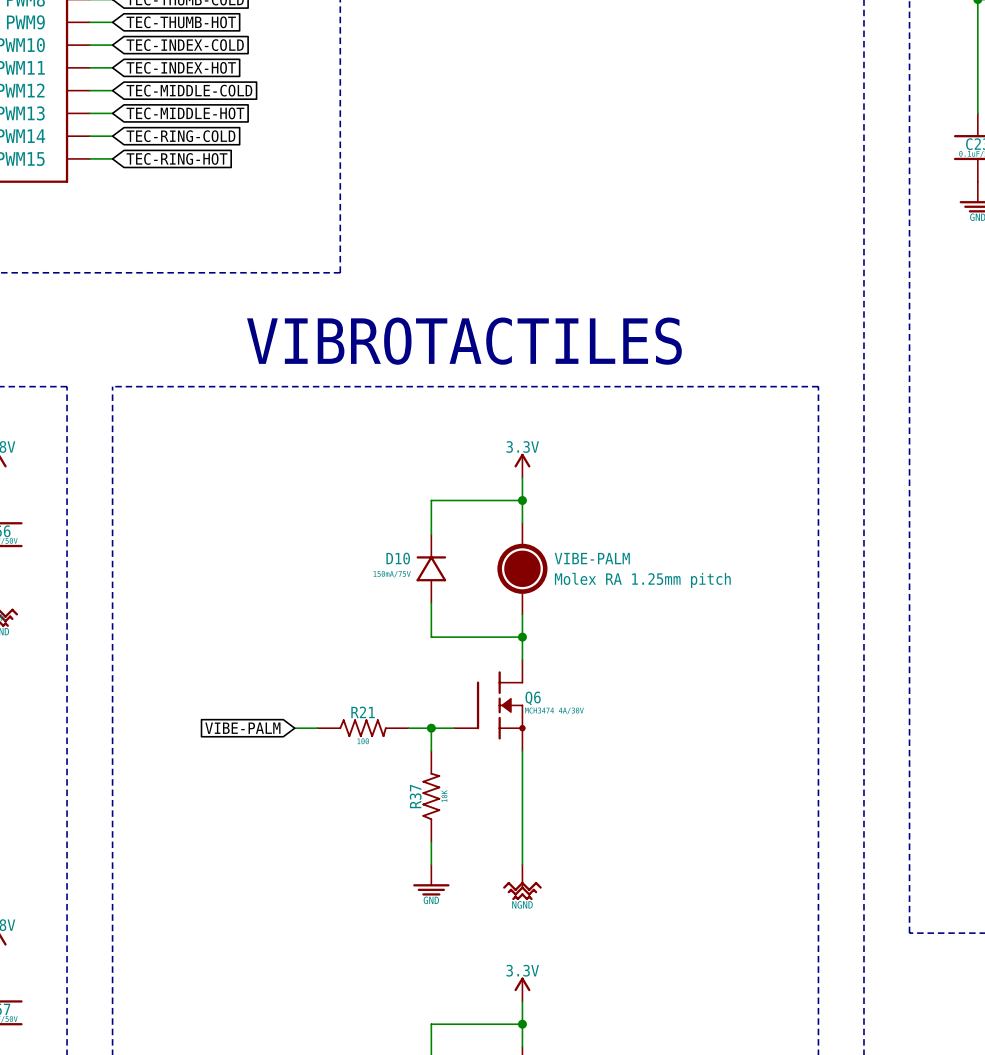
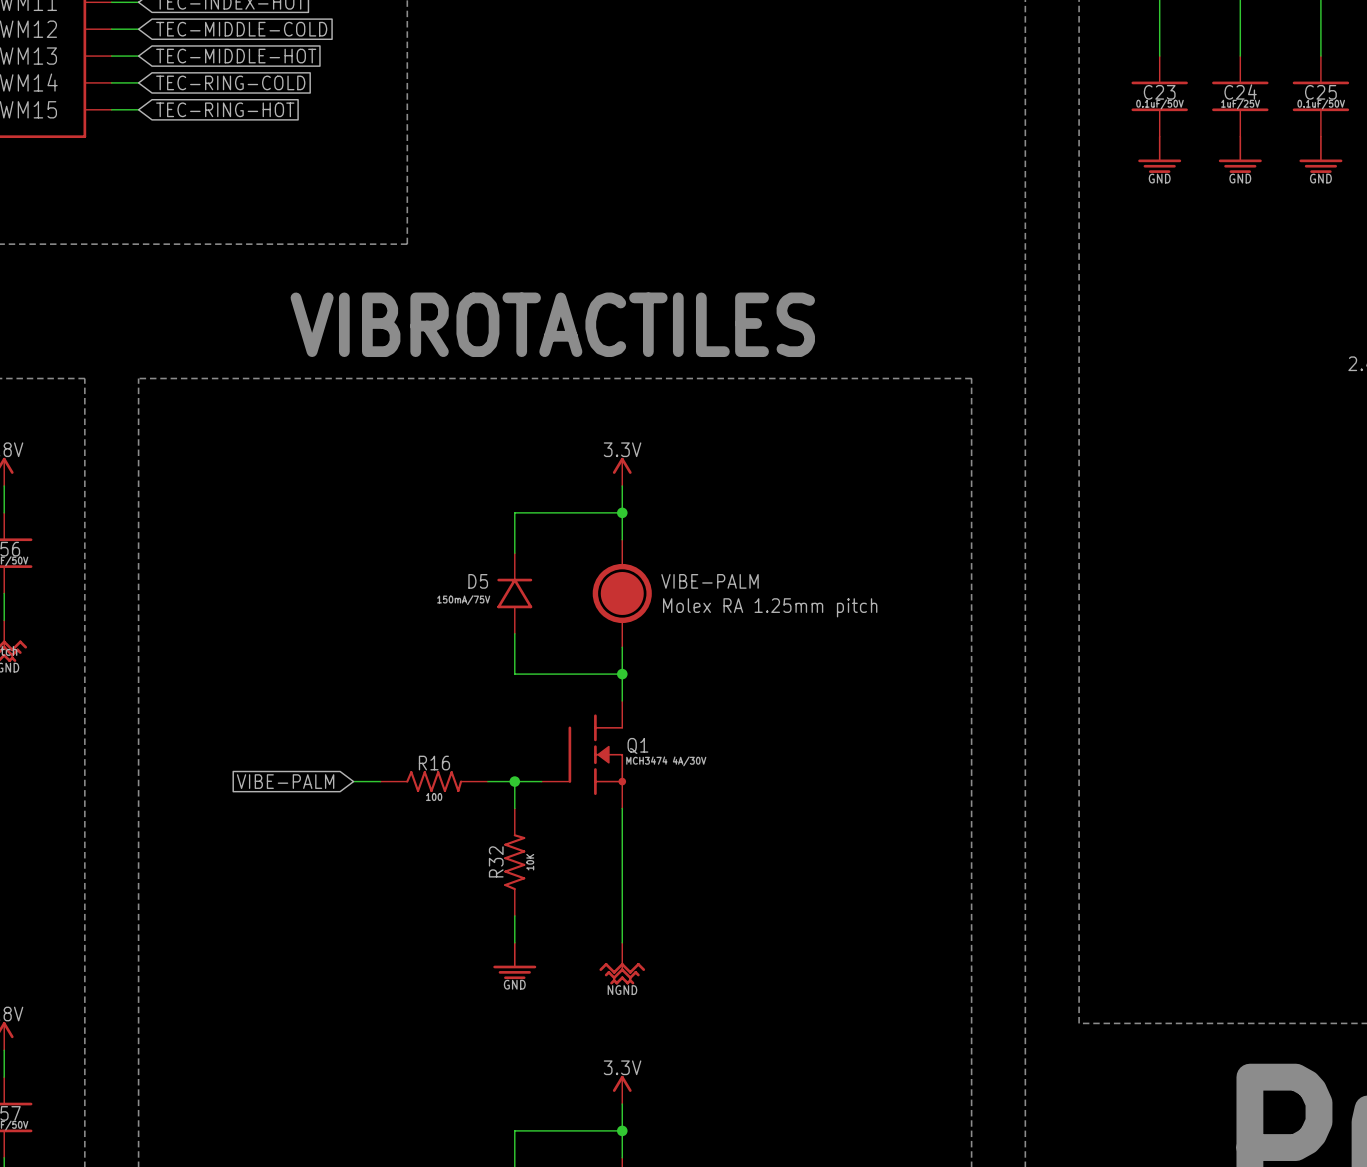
D10 name: D10 (398, 558) -> D5 (478, 581)
Q6 name: Q6 (533, 698) -> Q1 (637, 745)
R21 name: R21 (363, 712) -> R16 (434, 763)
R37 name: R37 (415, 796) -> R32 (496, 861)

